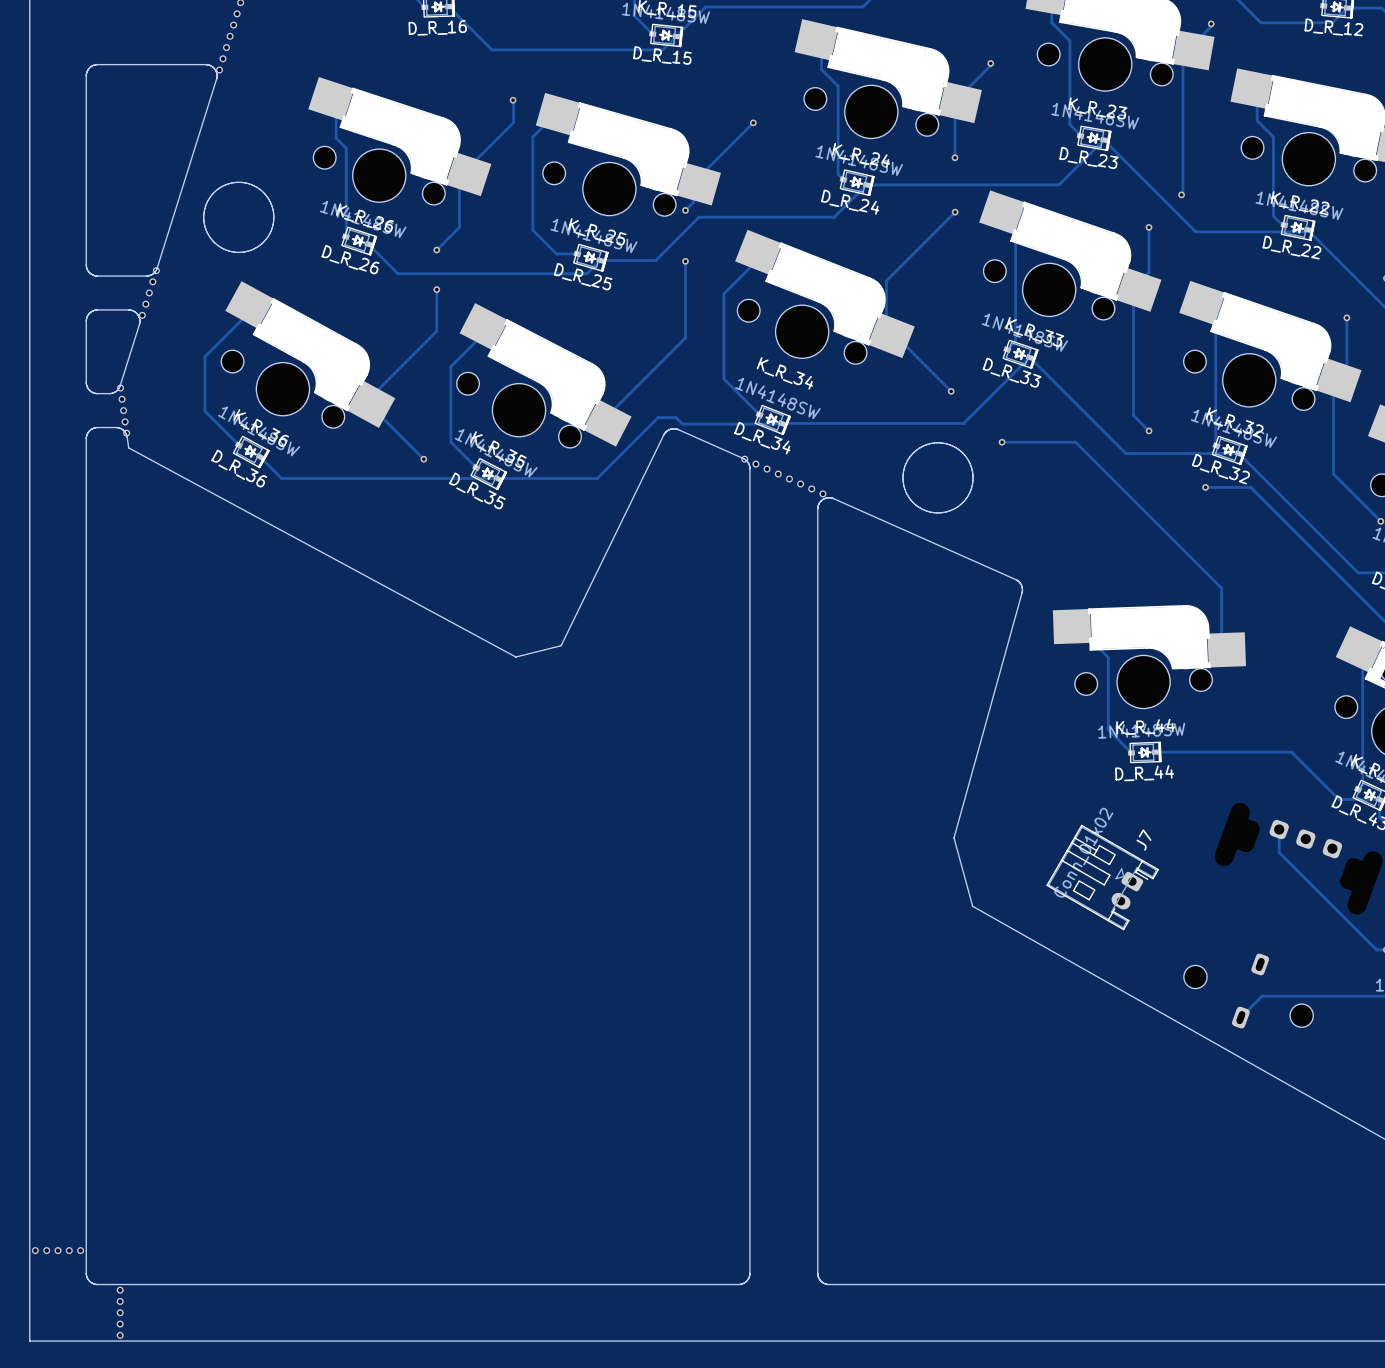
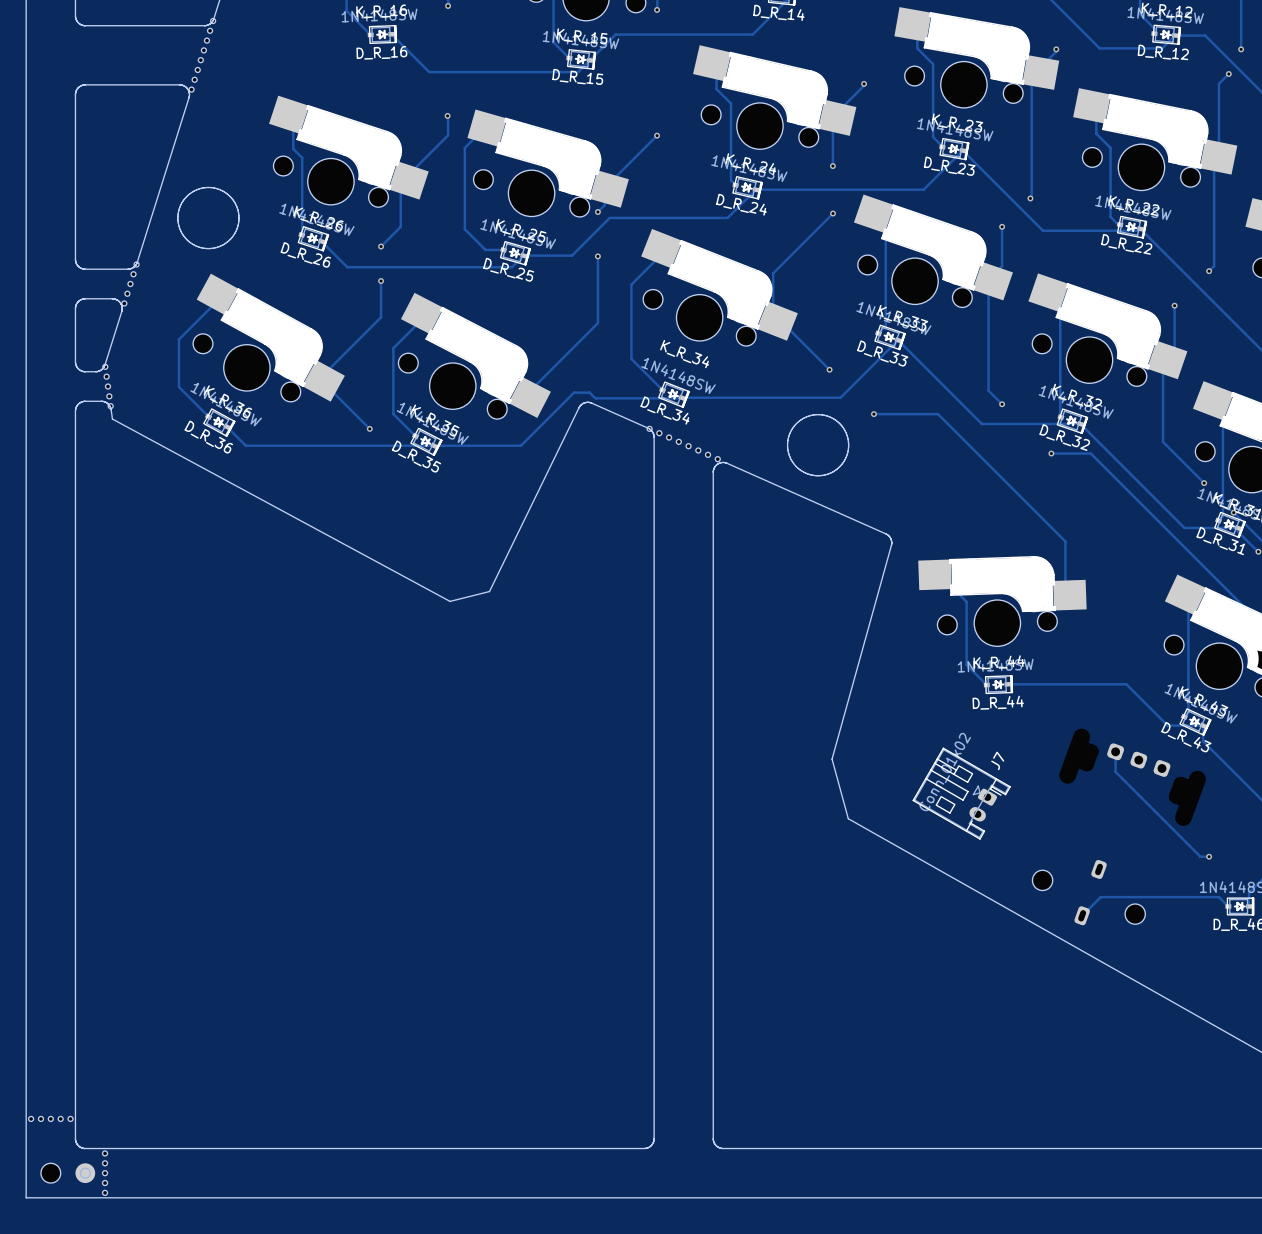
part: none -> (50, 1173)
part: none -> (85, 1173)

